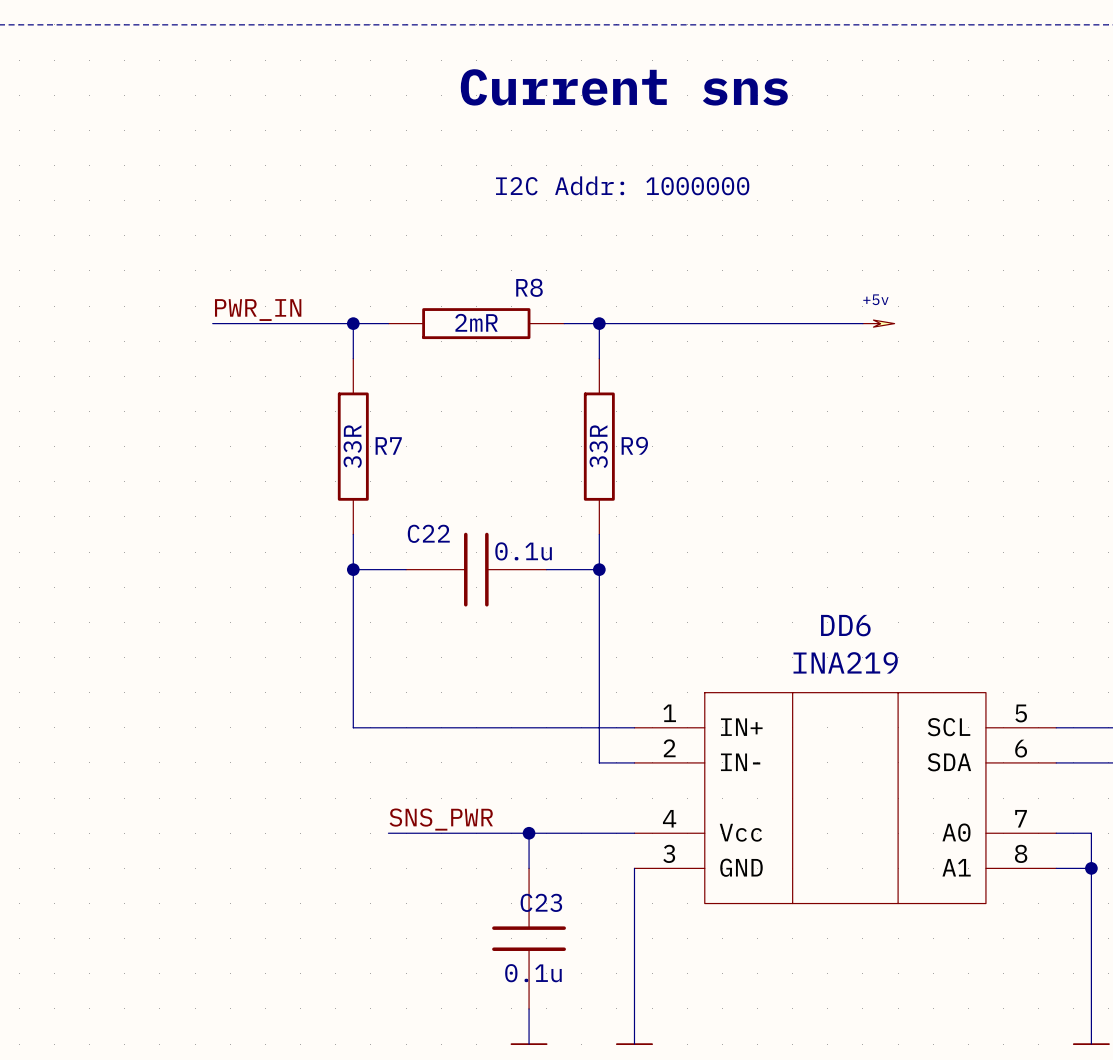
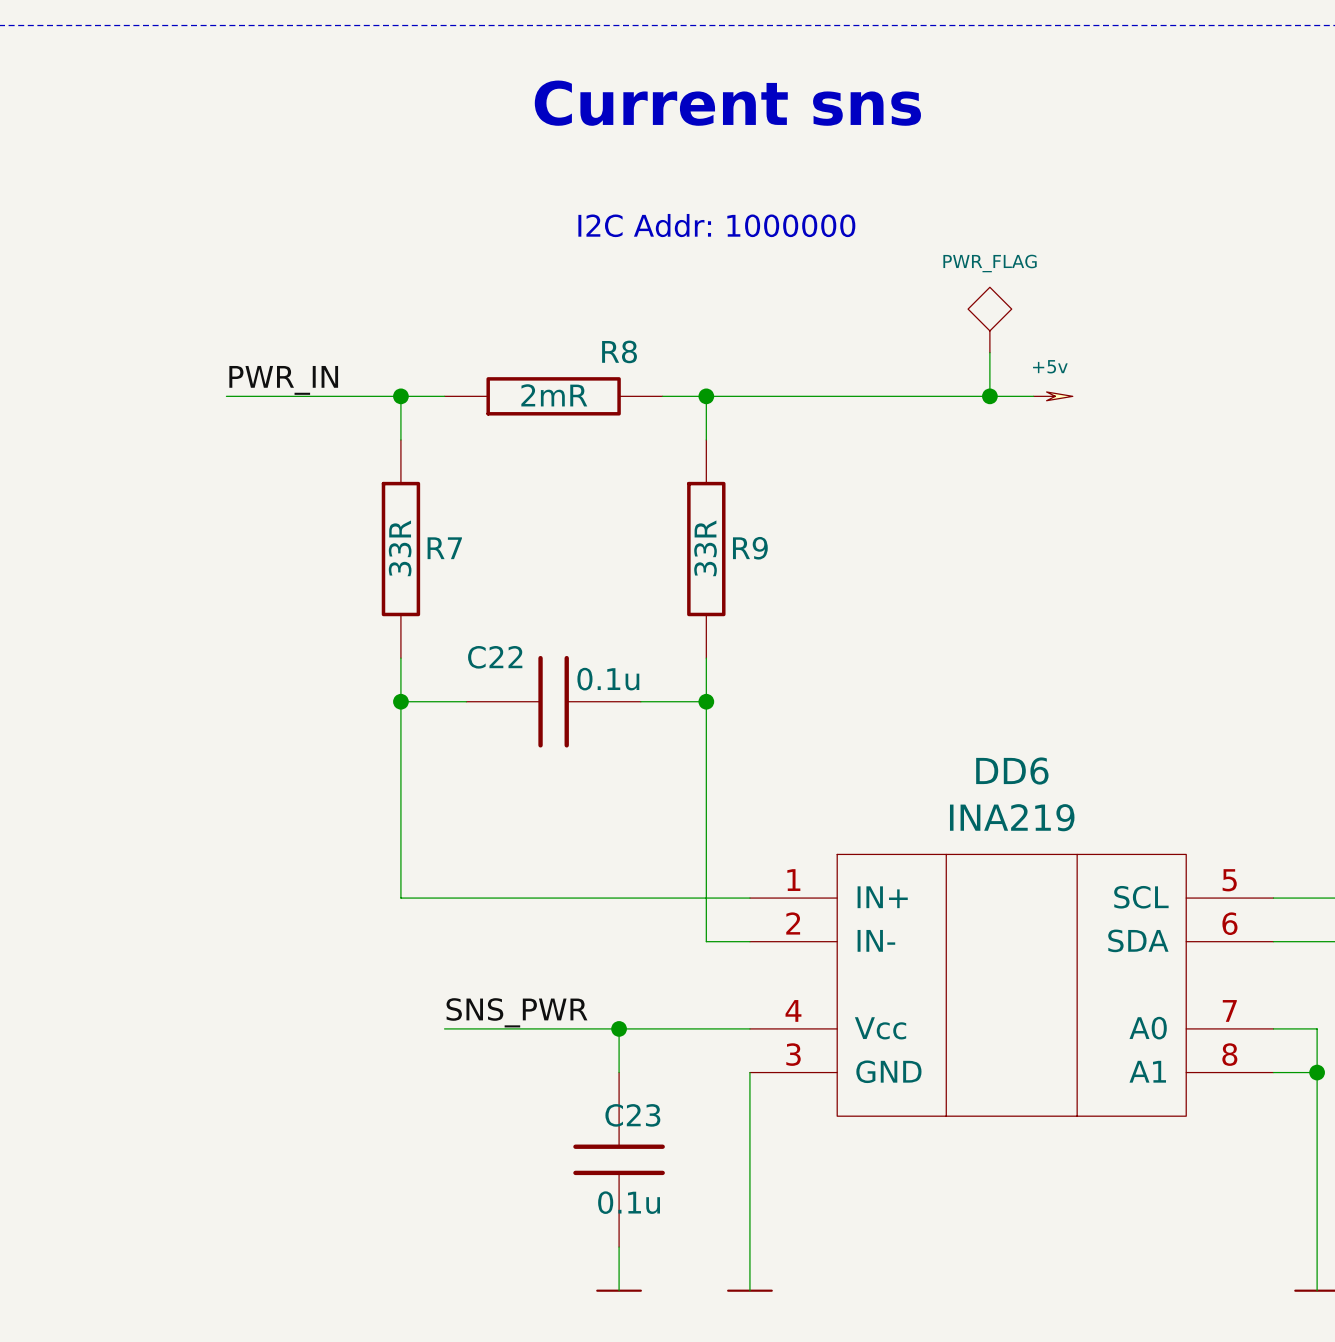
power symbol: none -> PWR_FLAG (989, 320)
wire: none -> (989, 352) (989, 396)
junction: none -> (989, 396)

